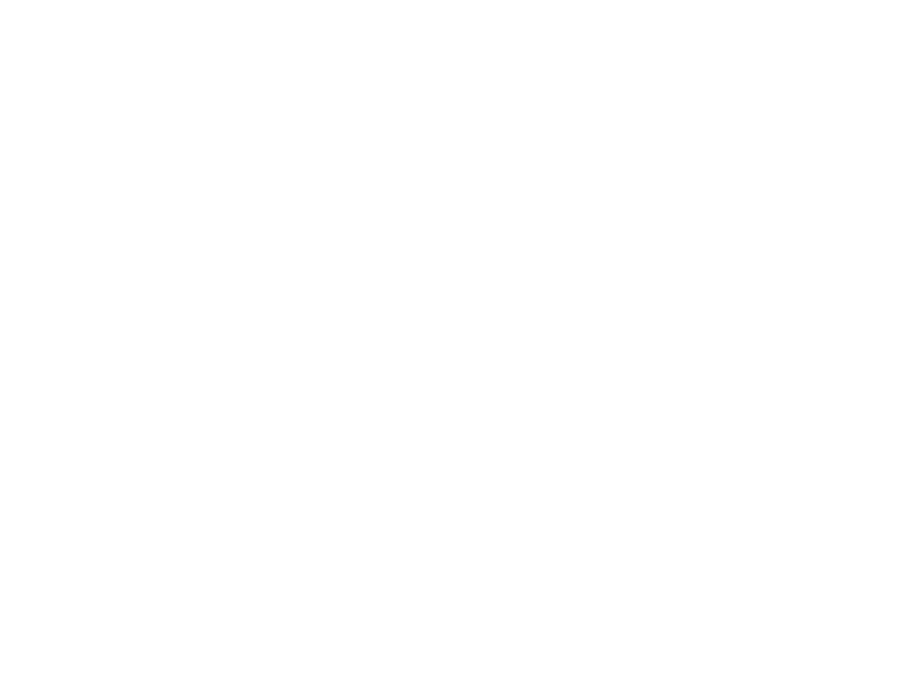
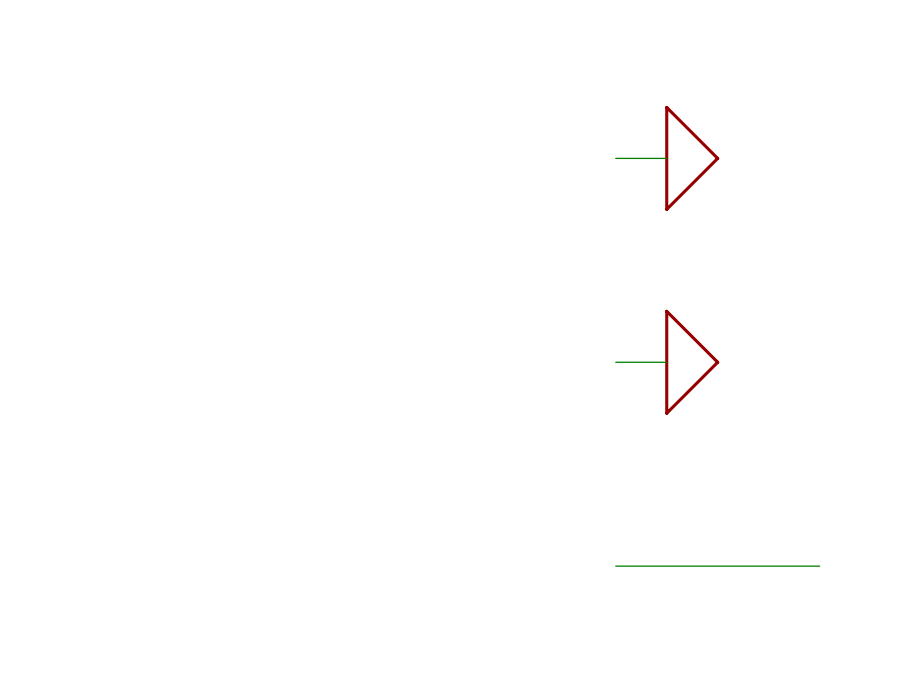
wire: none -> (615, 158) (666, 158)
power symbol: none -> (692, 158)
wire: none -> (615, 362) (666, 362)
power symbol: none -> (692, 362)
wire: none -> (615, 566) (819, 566)

